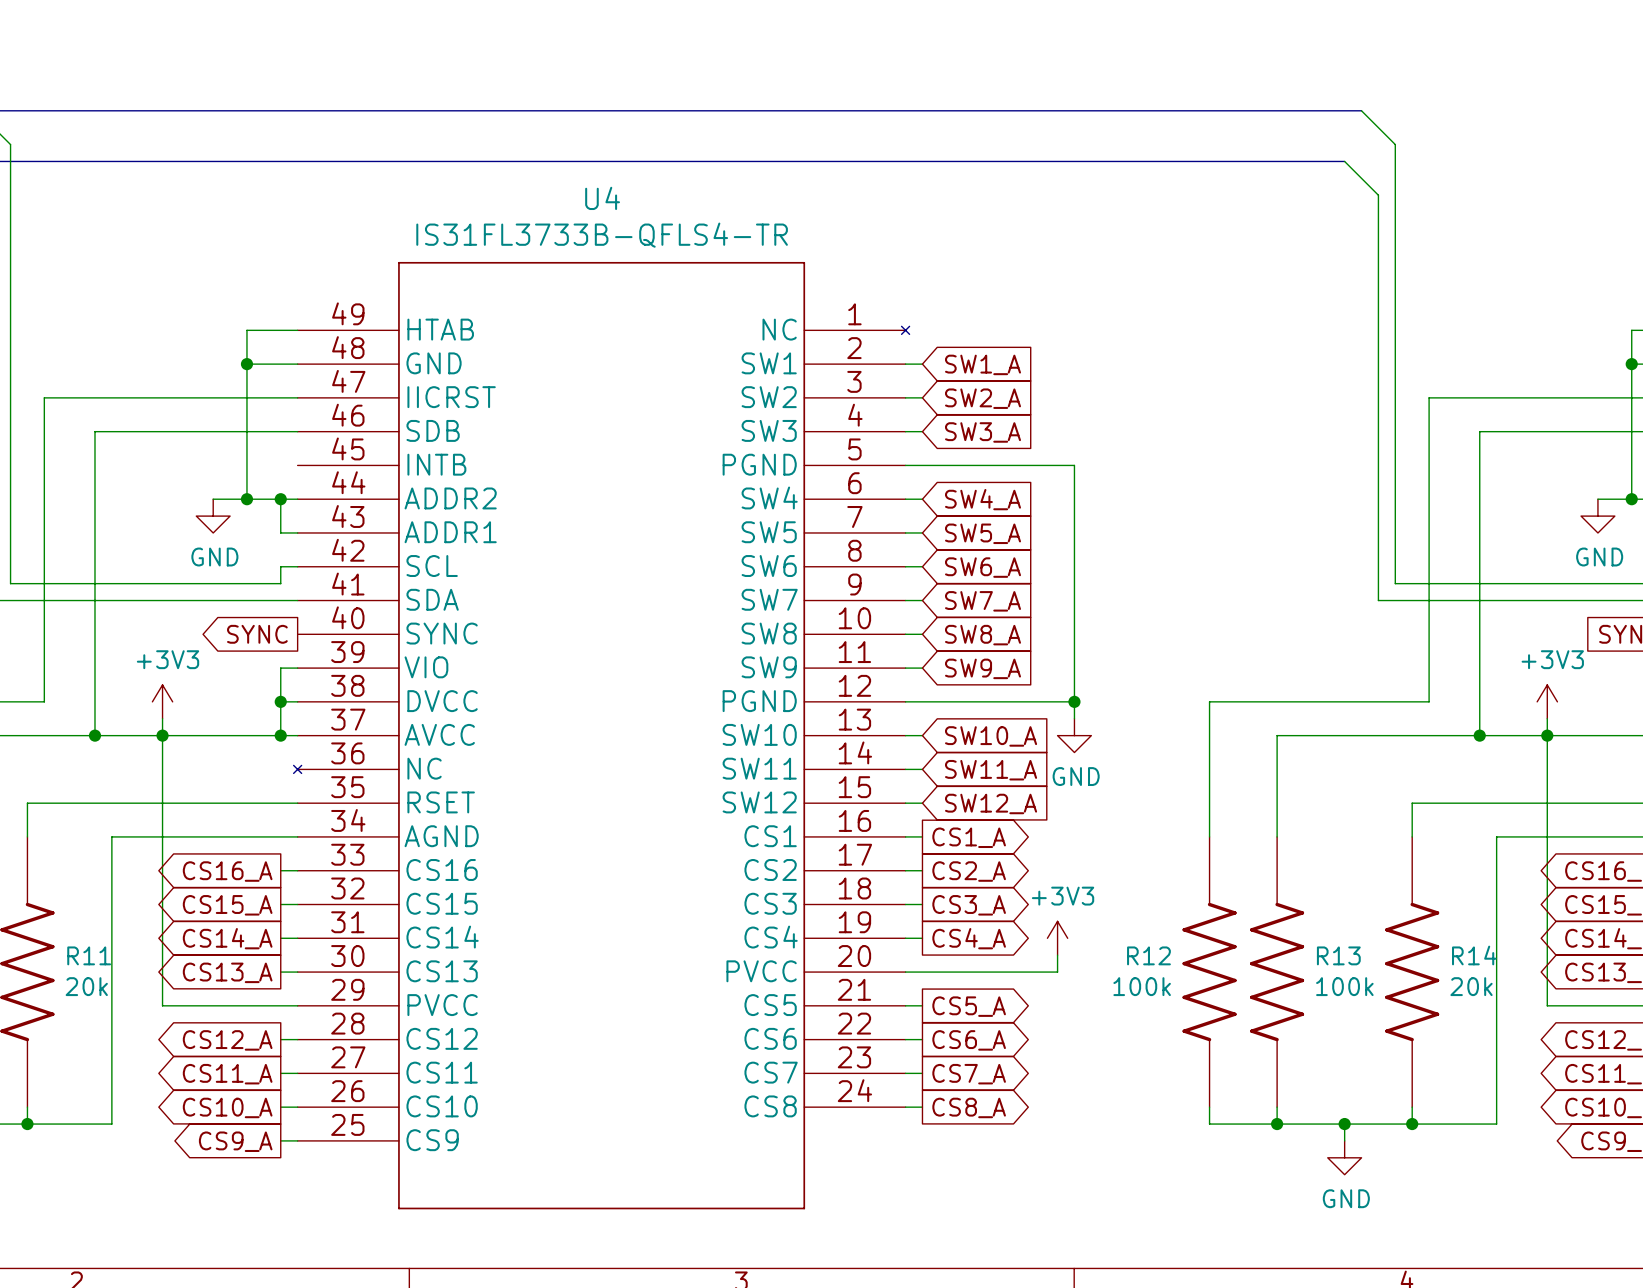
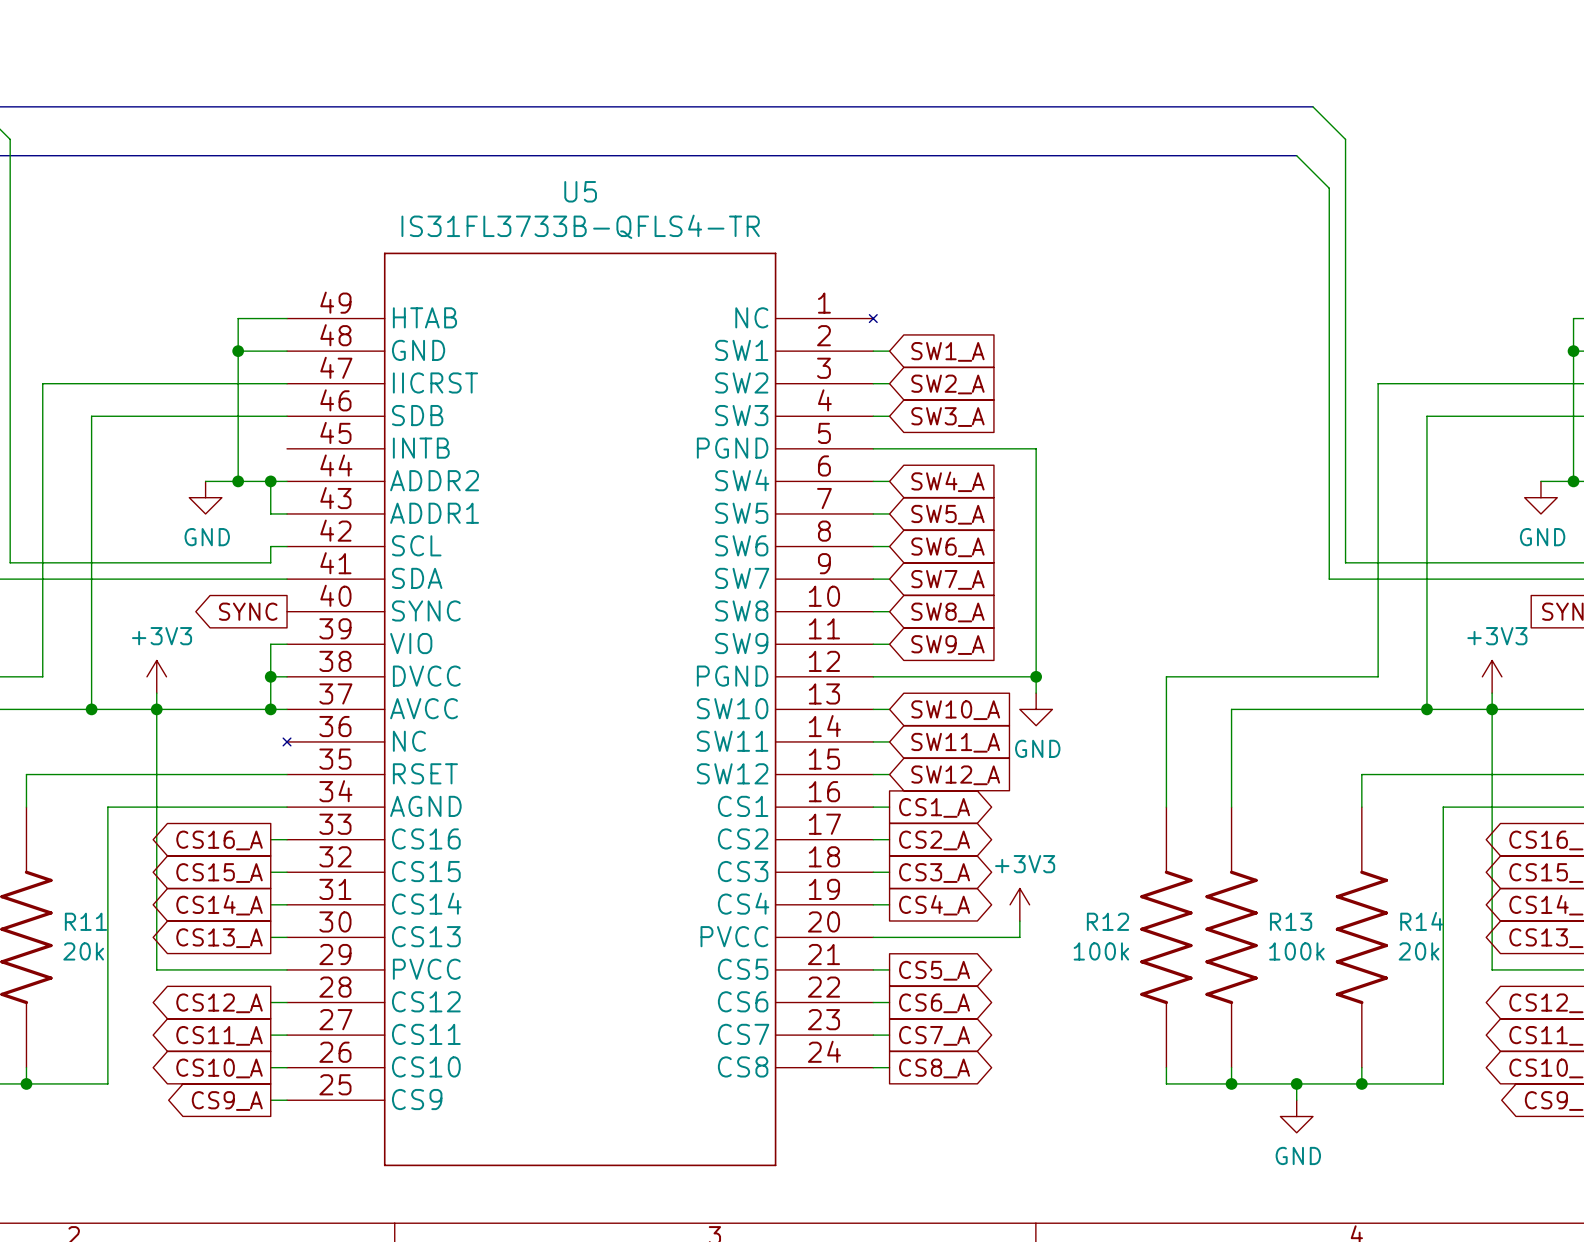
U4 name: U4 (602, 198) -> U5 (580, 191)

